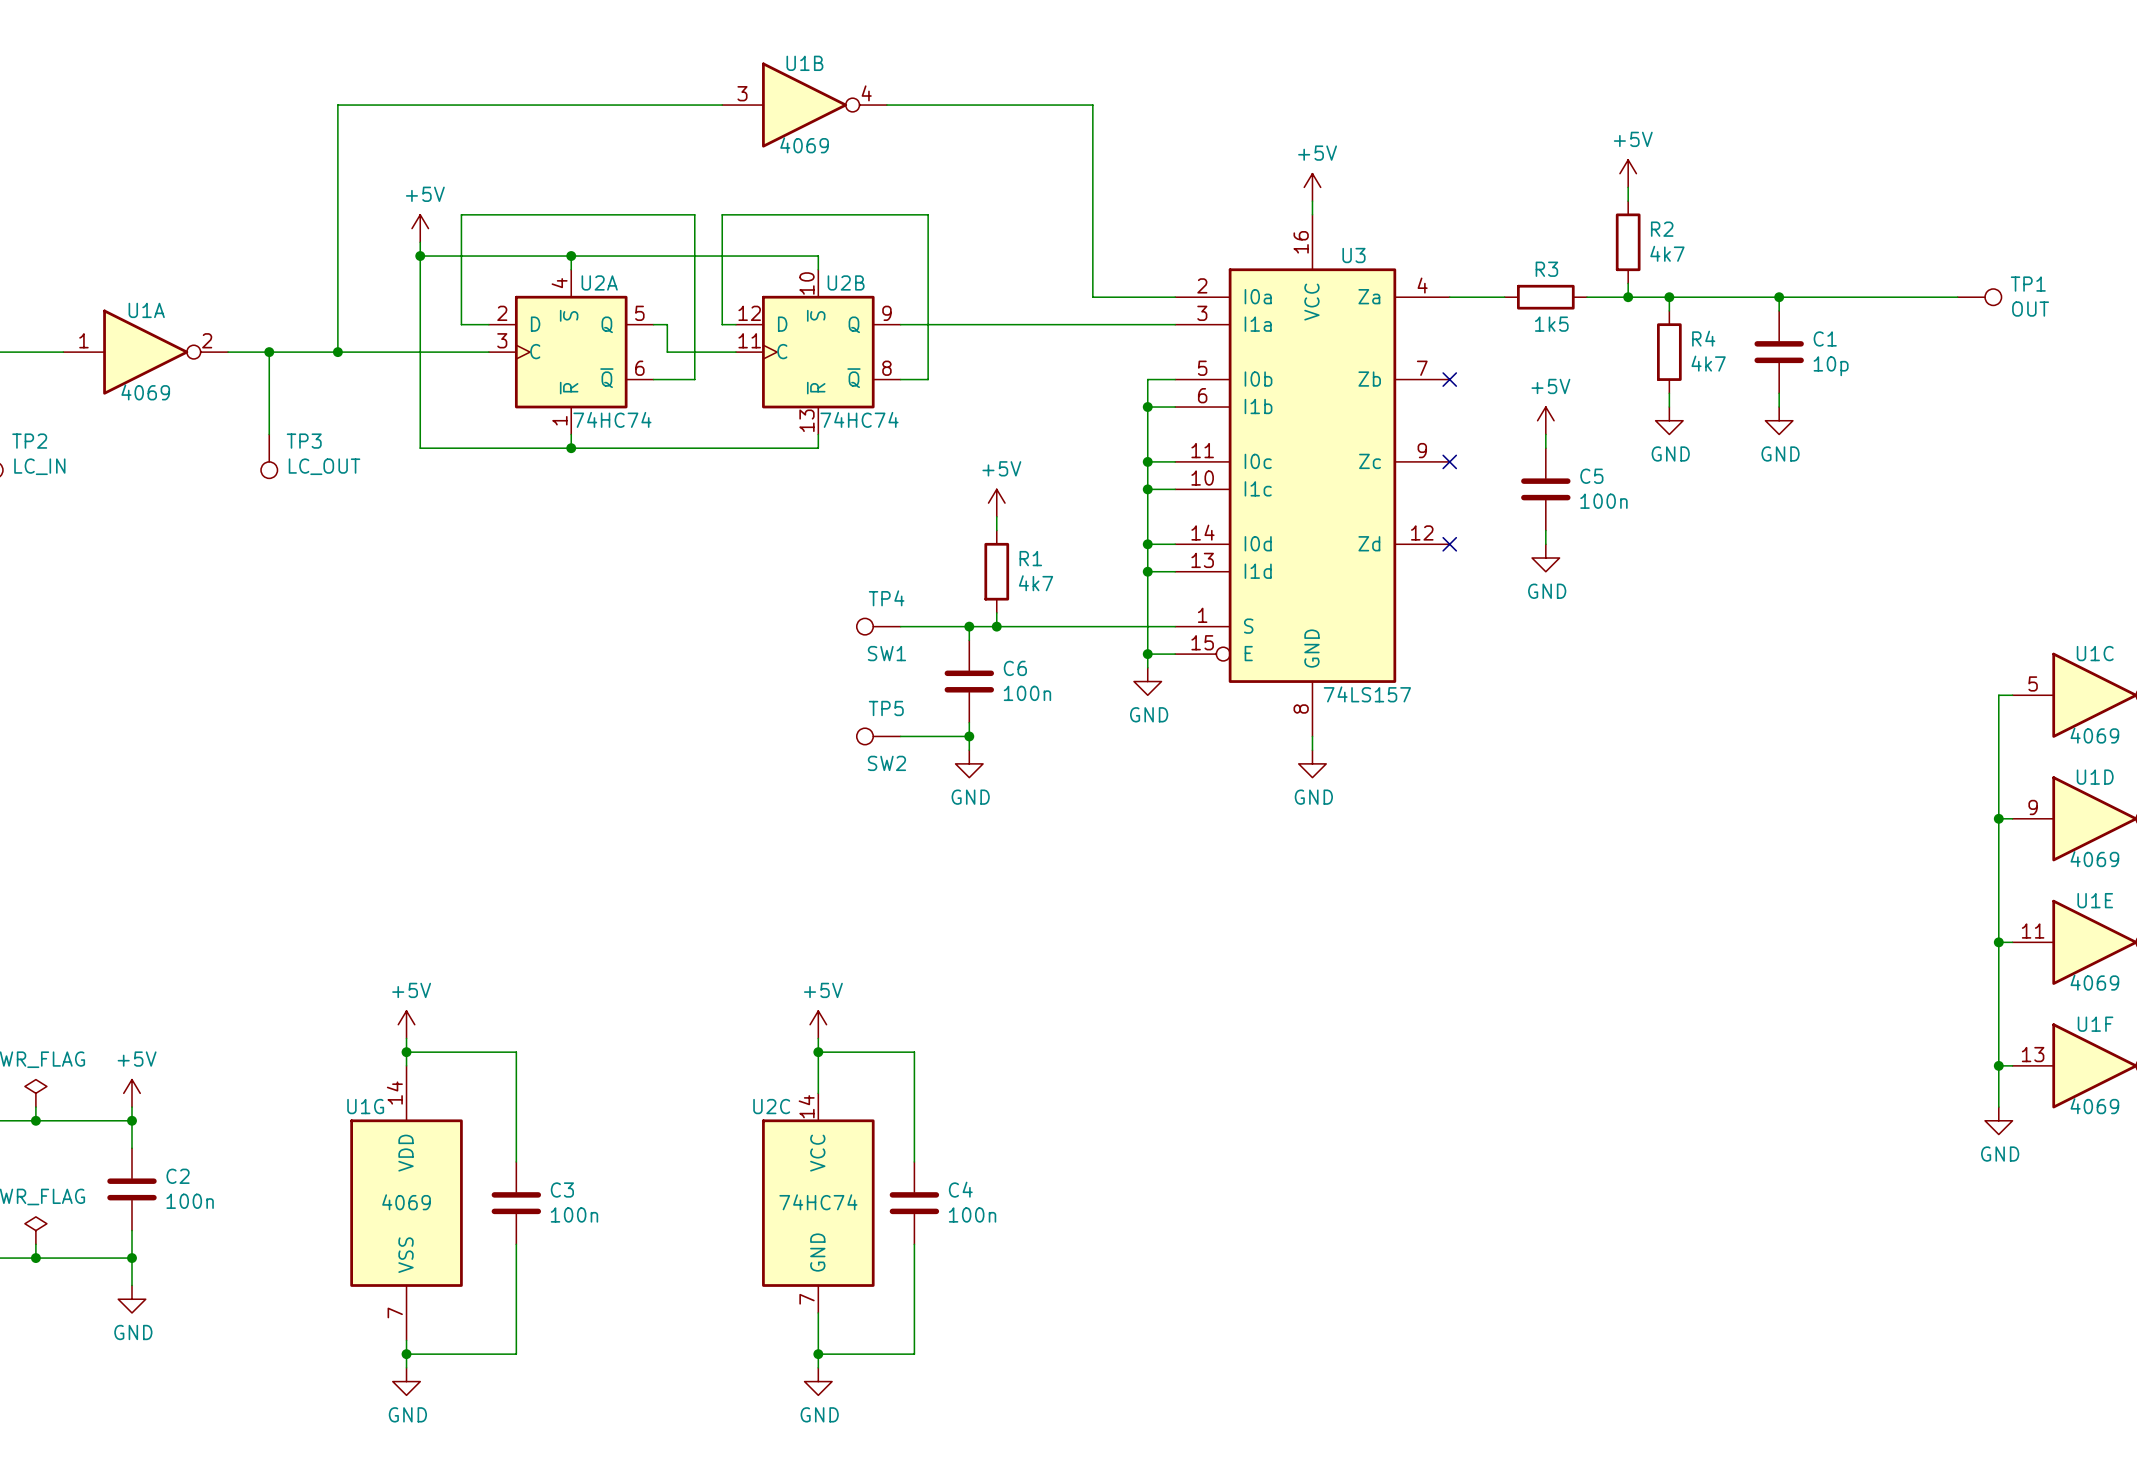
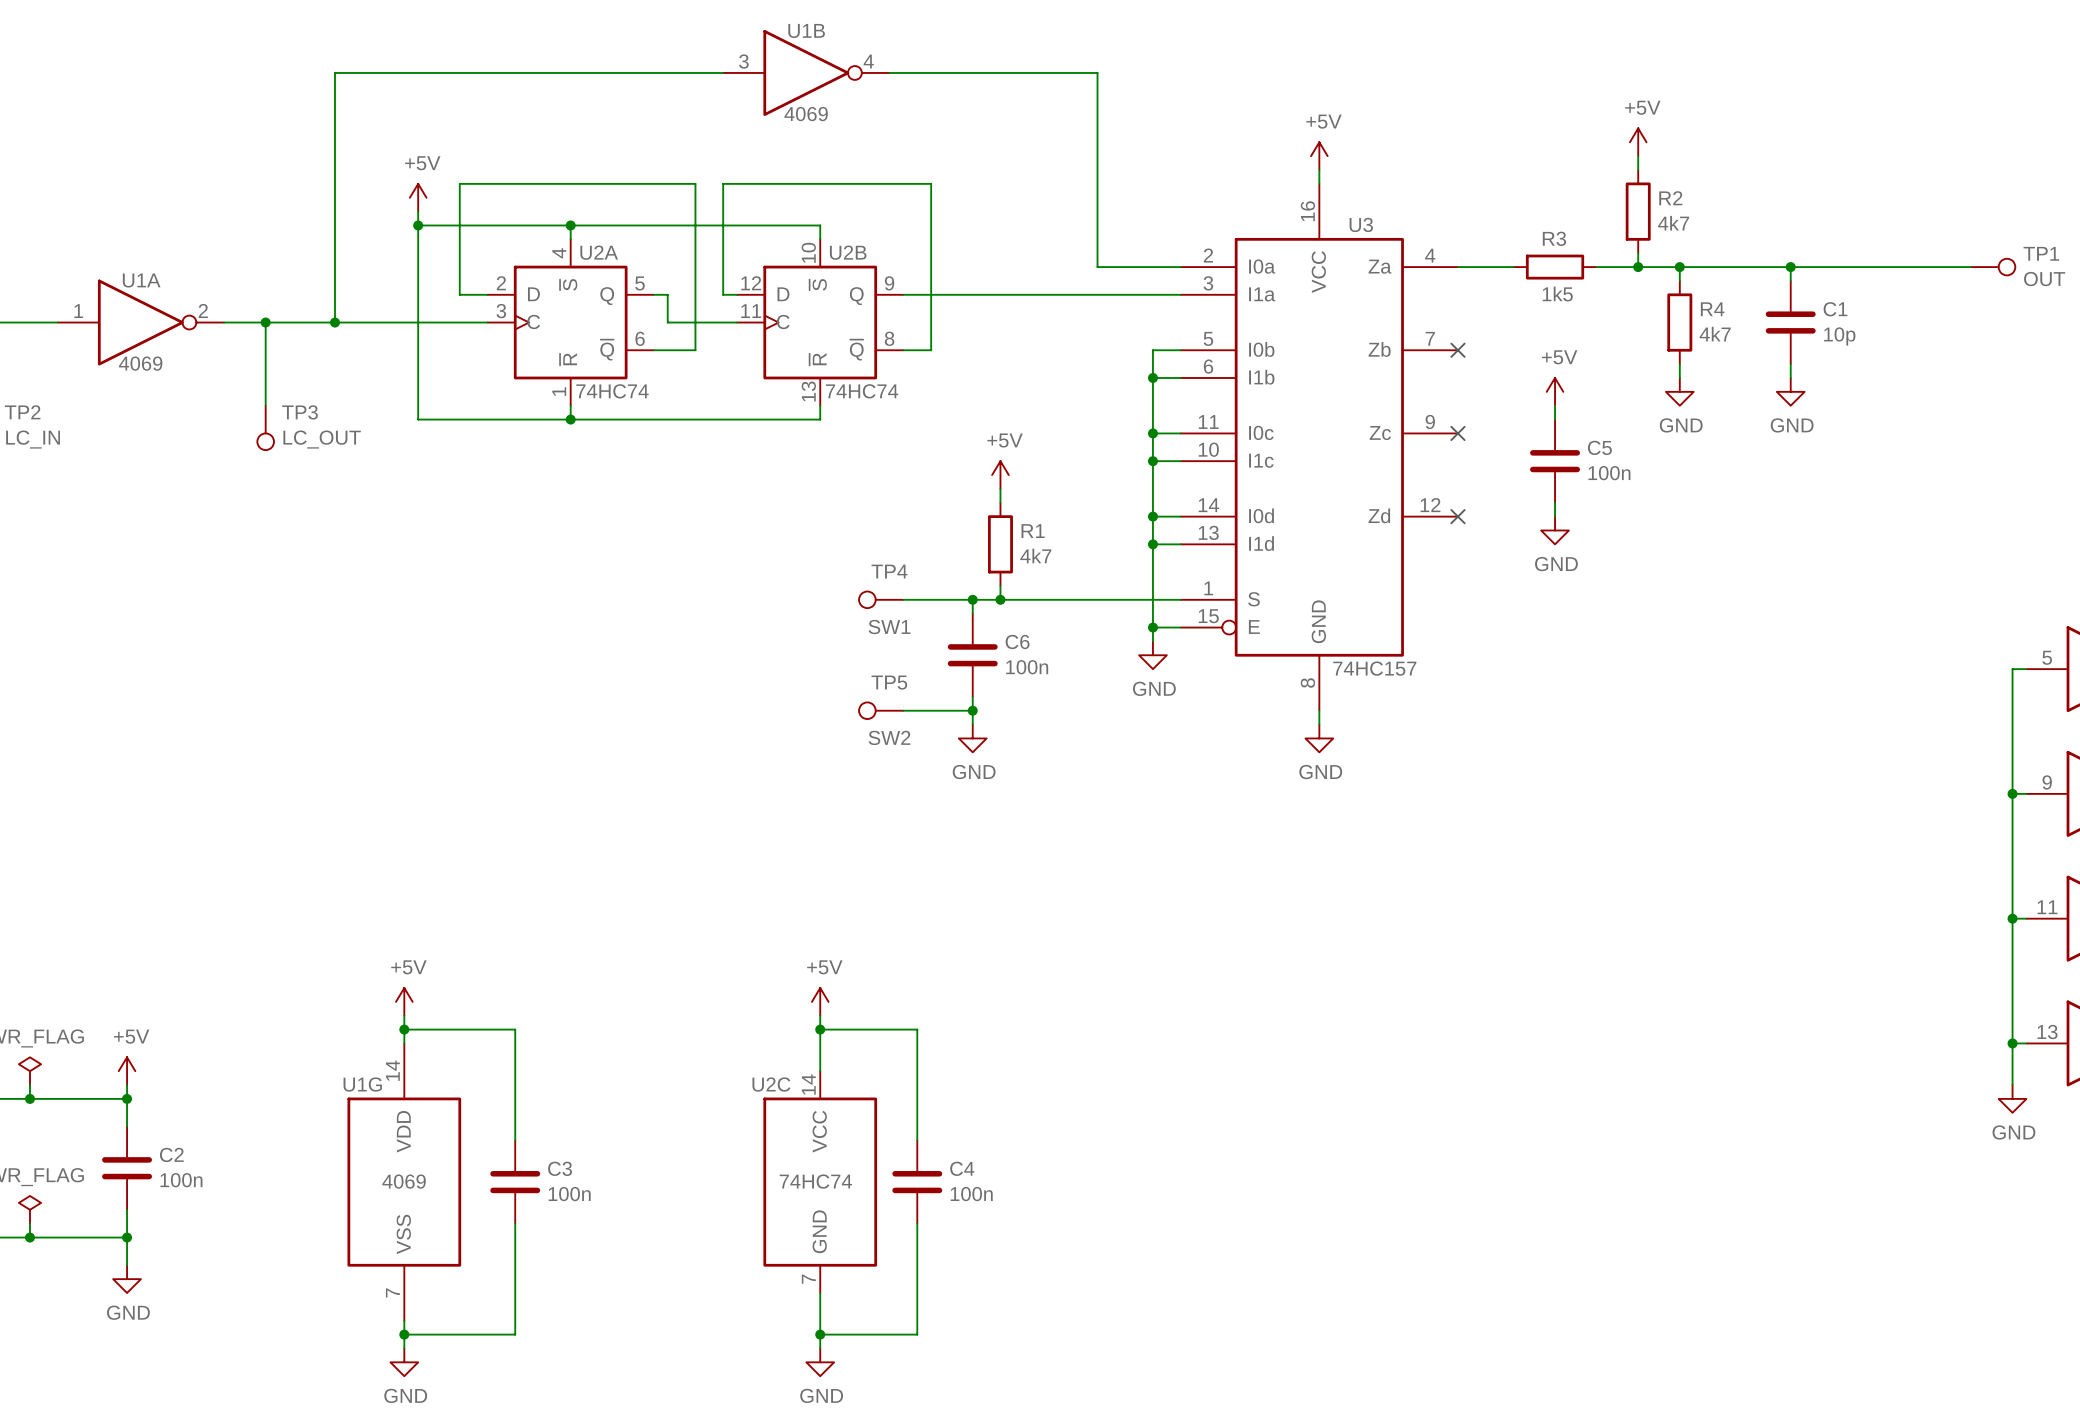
U3 value: 74LS157 (1367, 694) -> 74HC157 (1374, 668)

